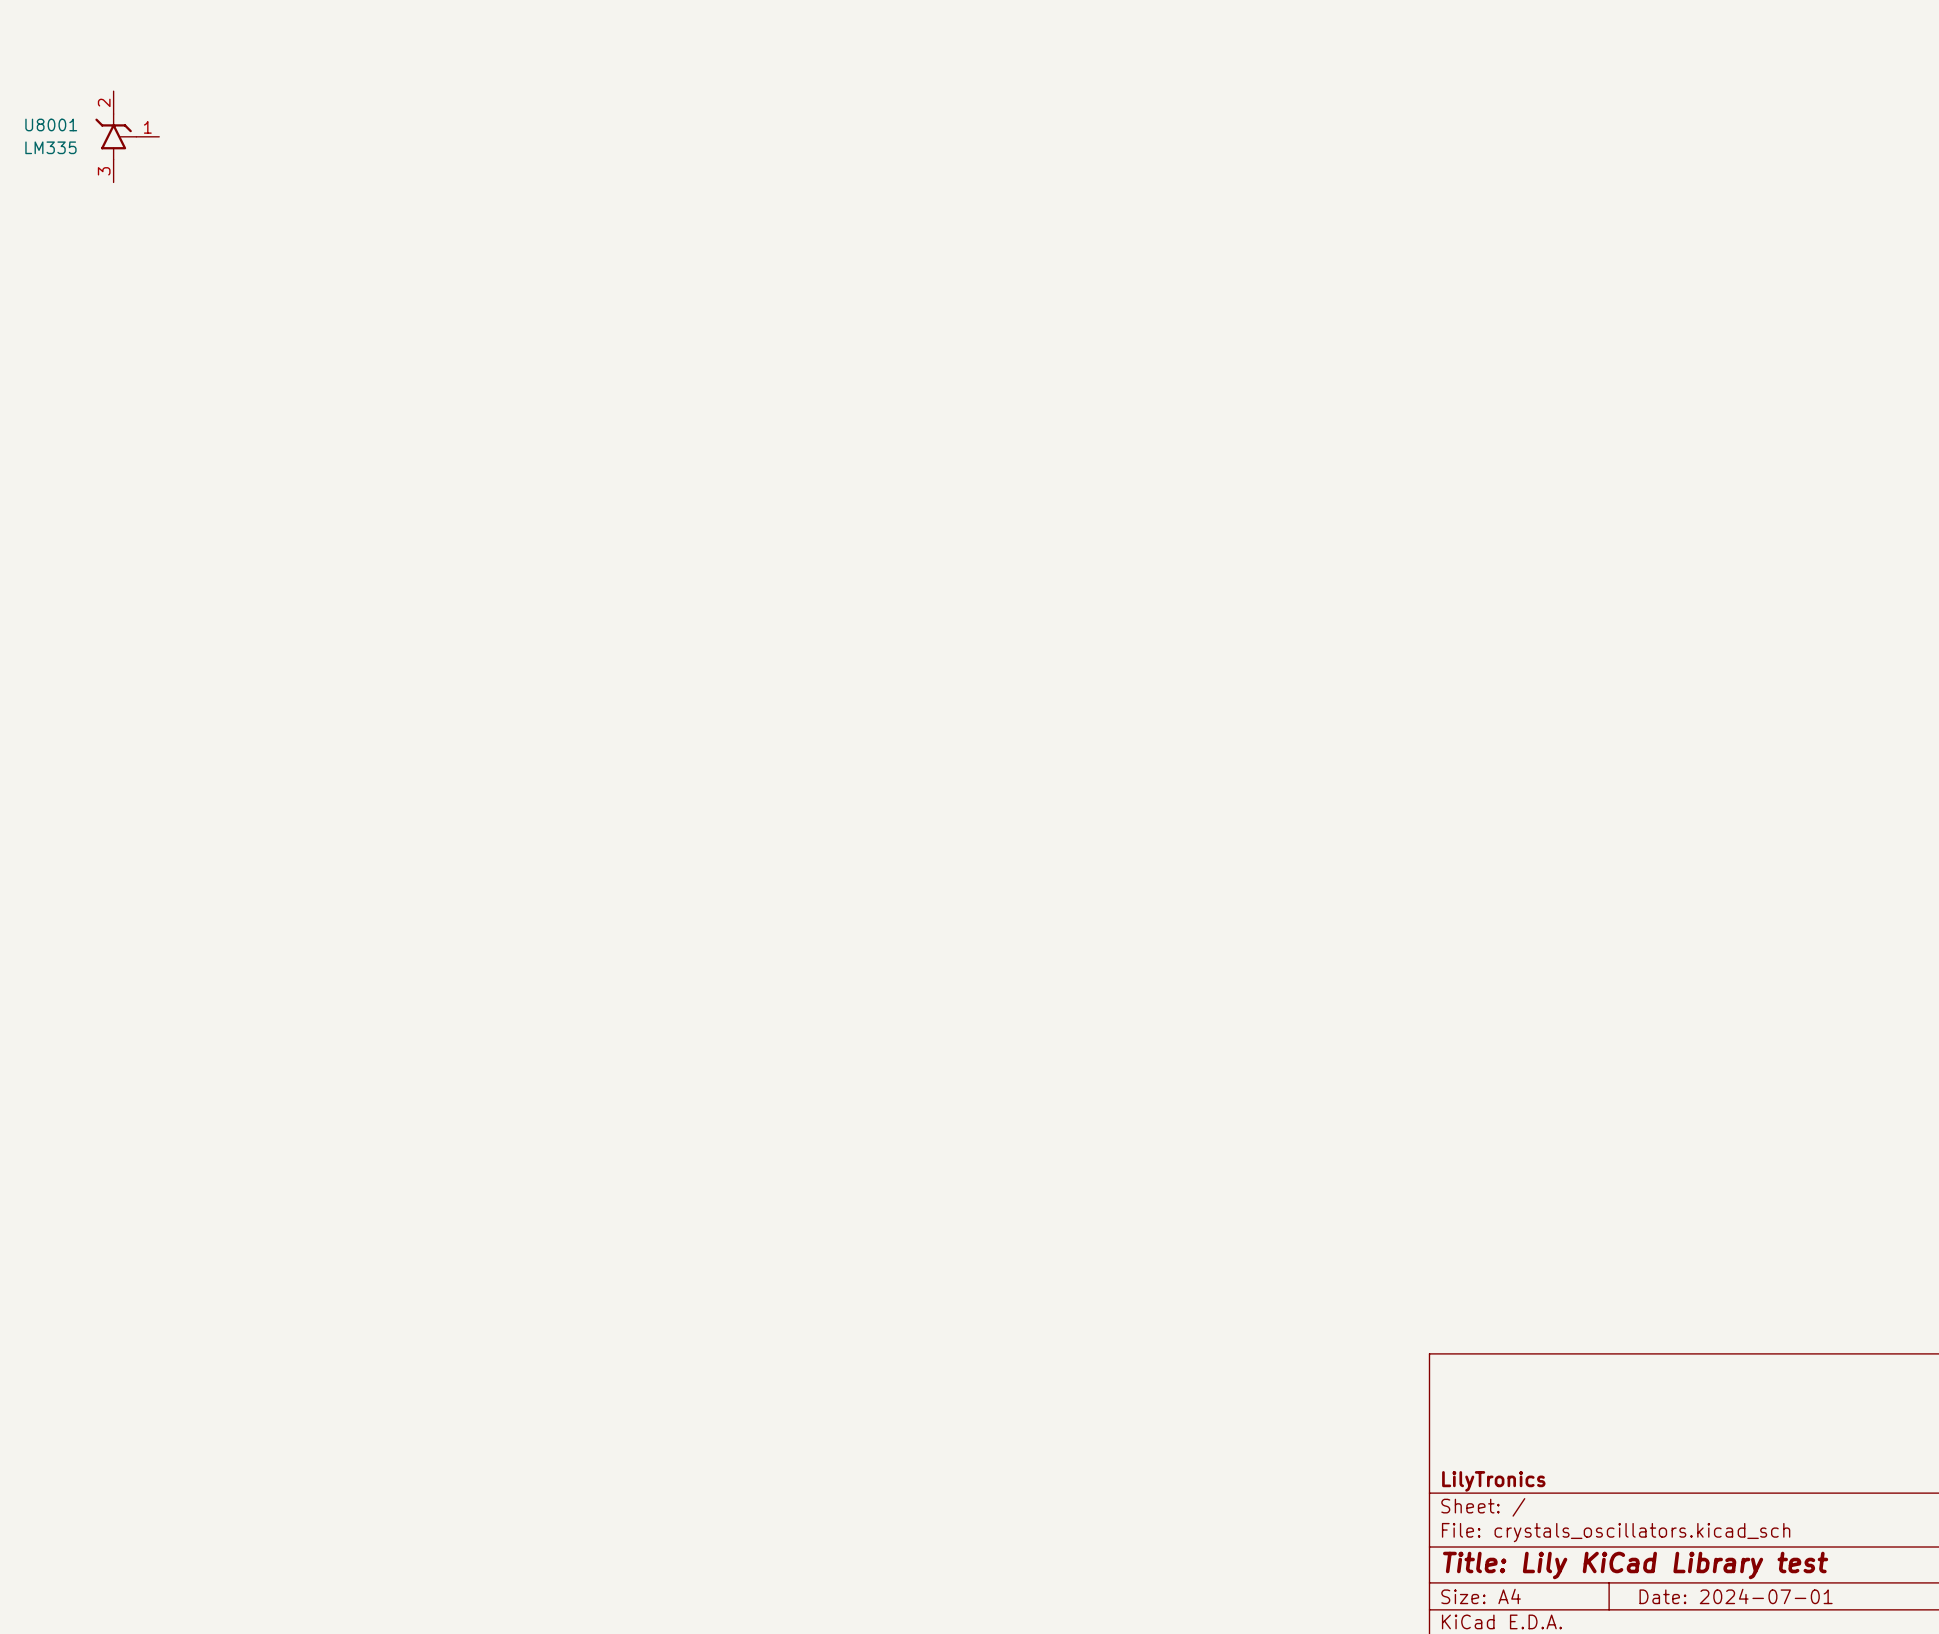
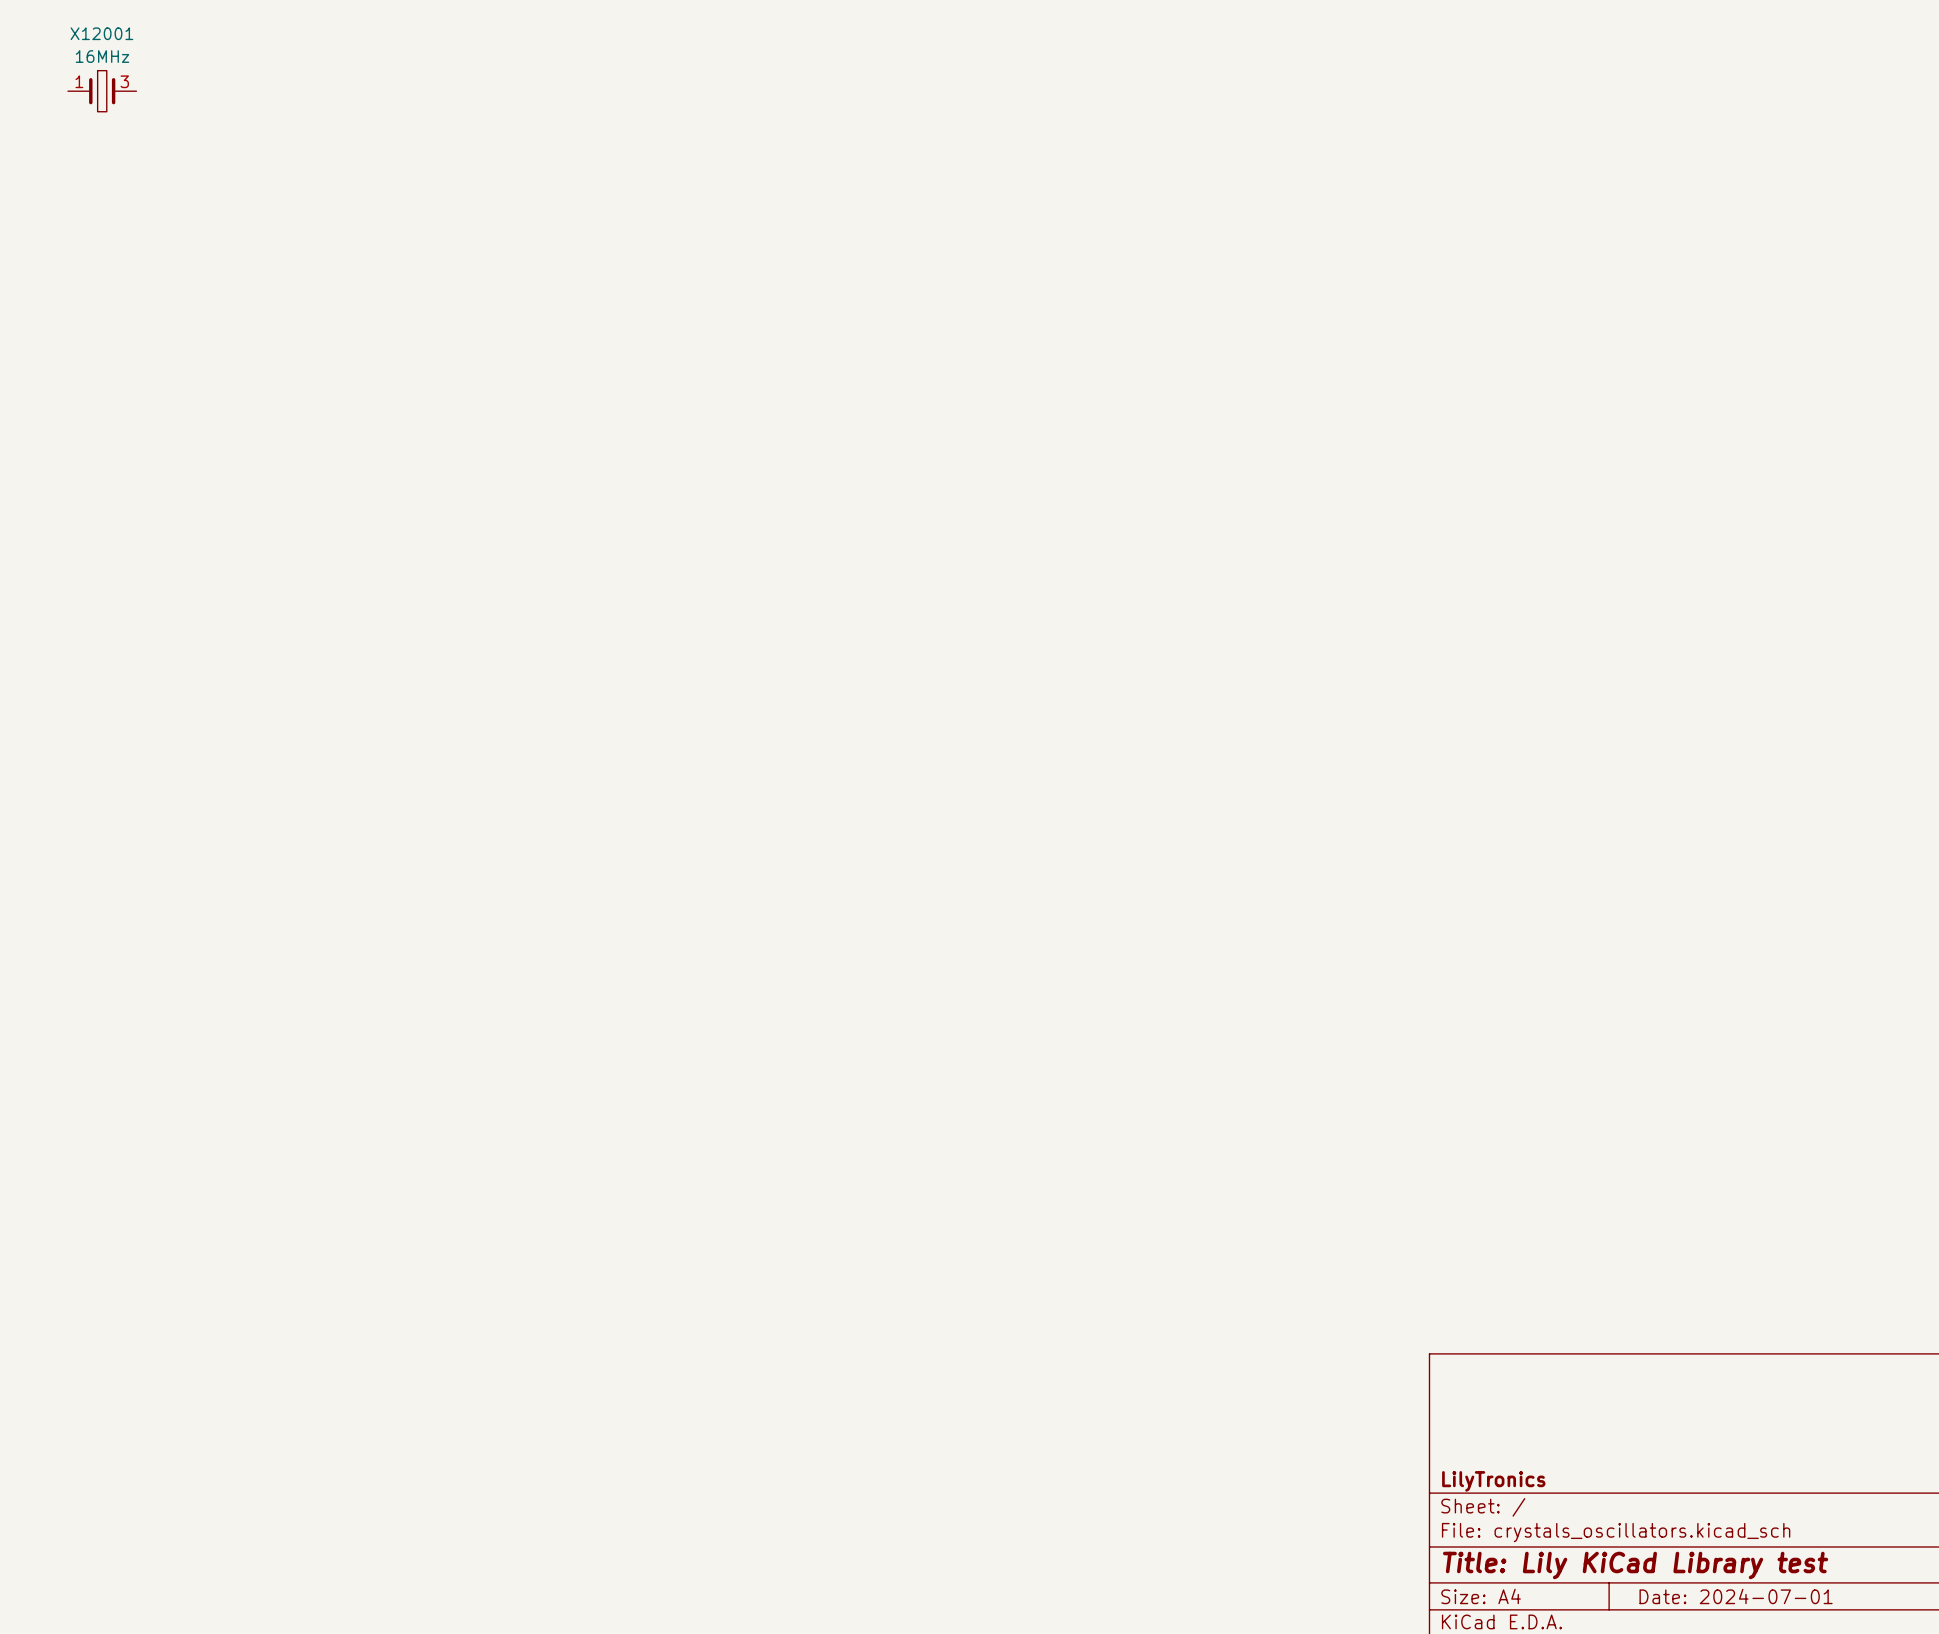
X12001: none -> 16MHz (102, 91)
U8001: LM335 (127, 136) -> none

